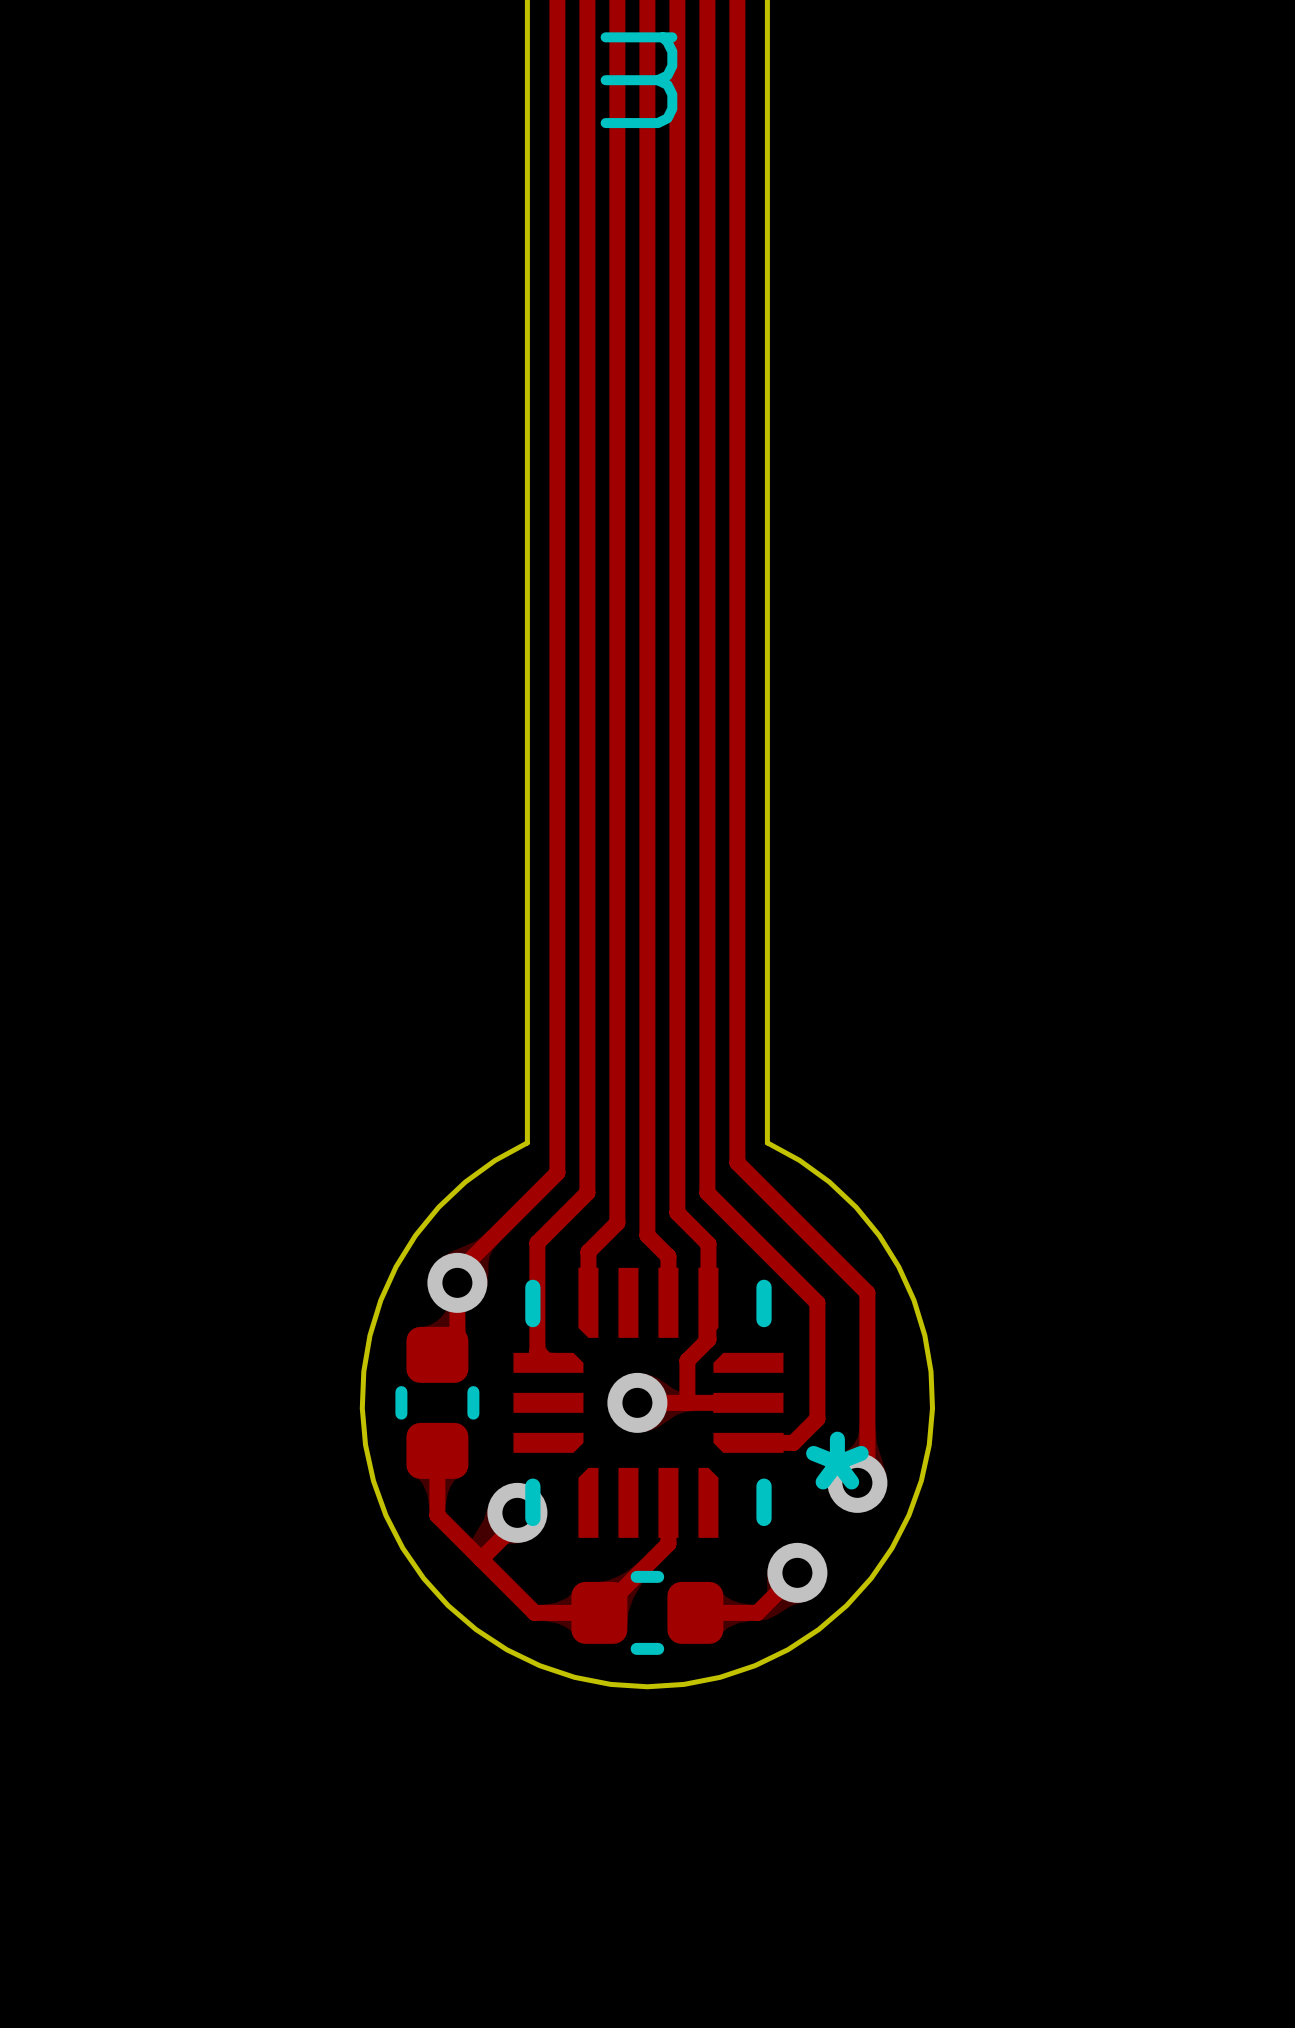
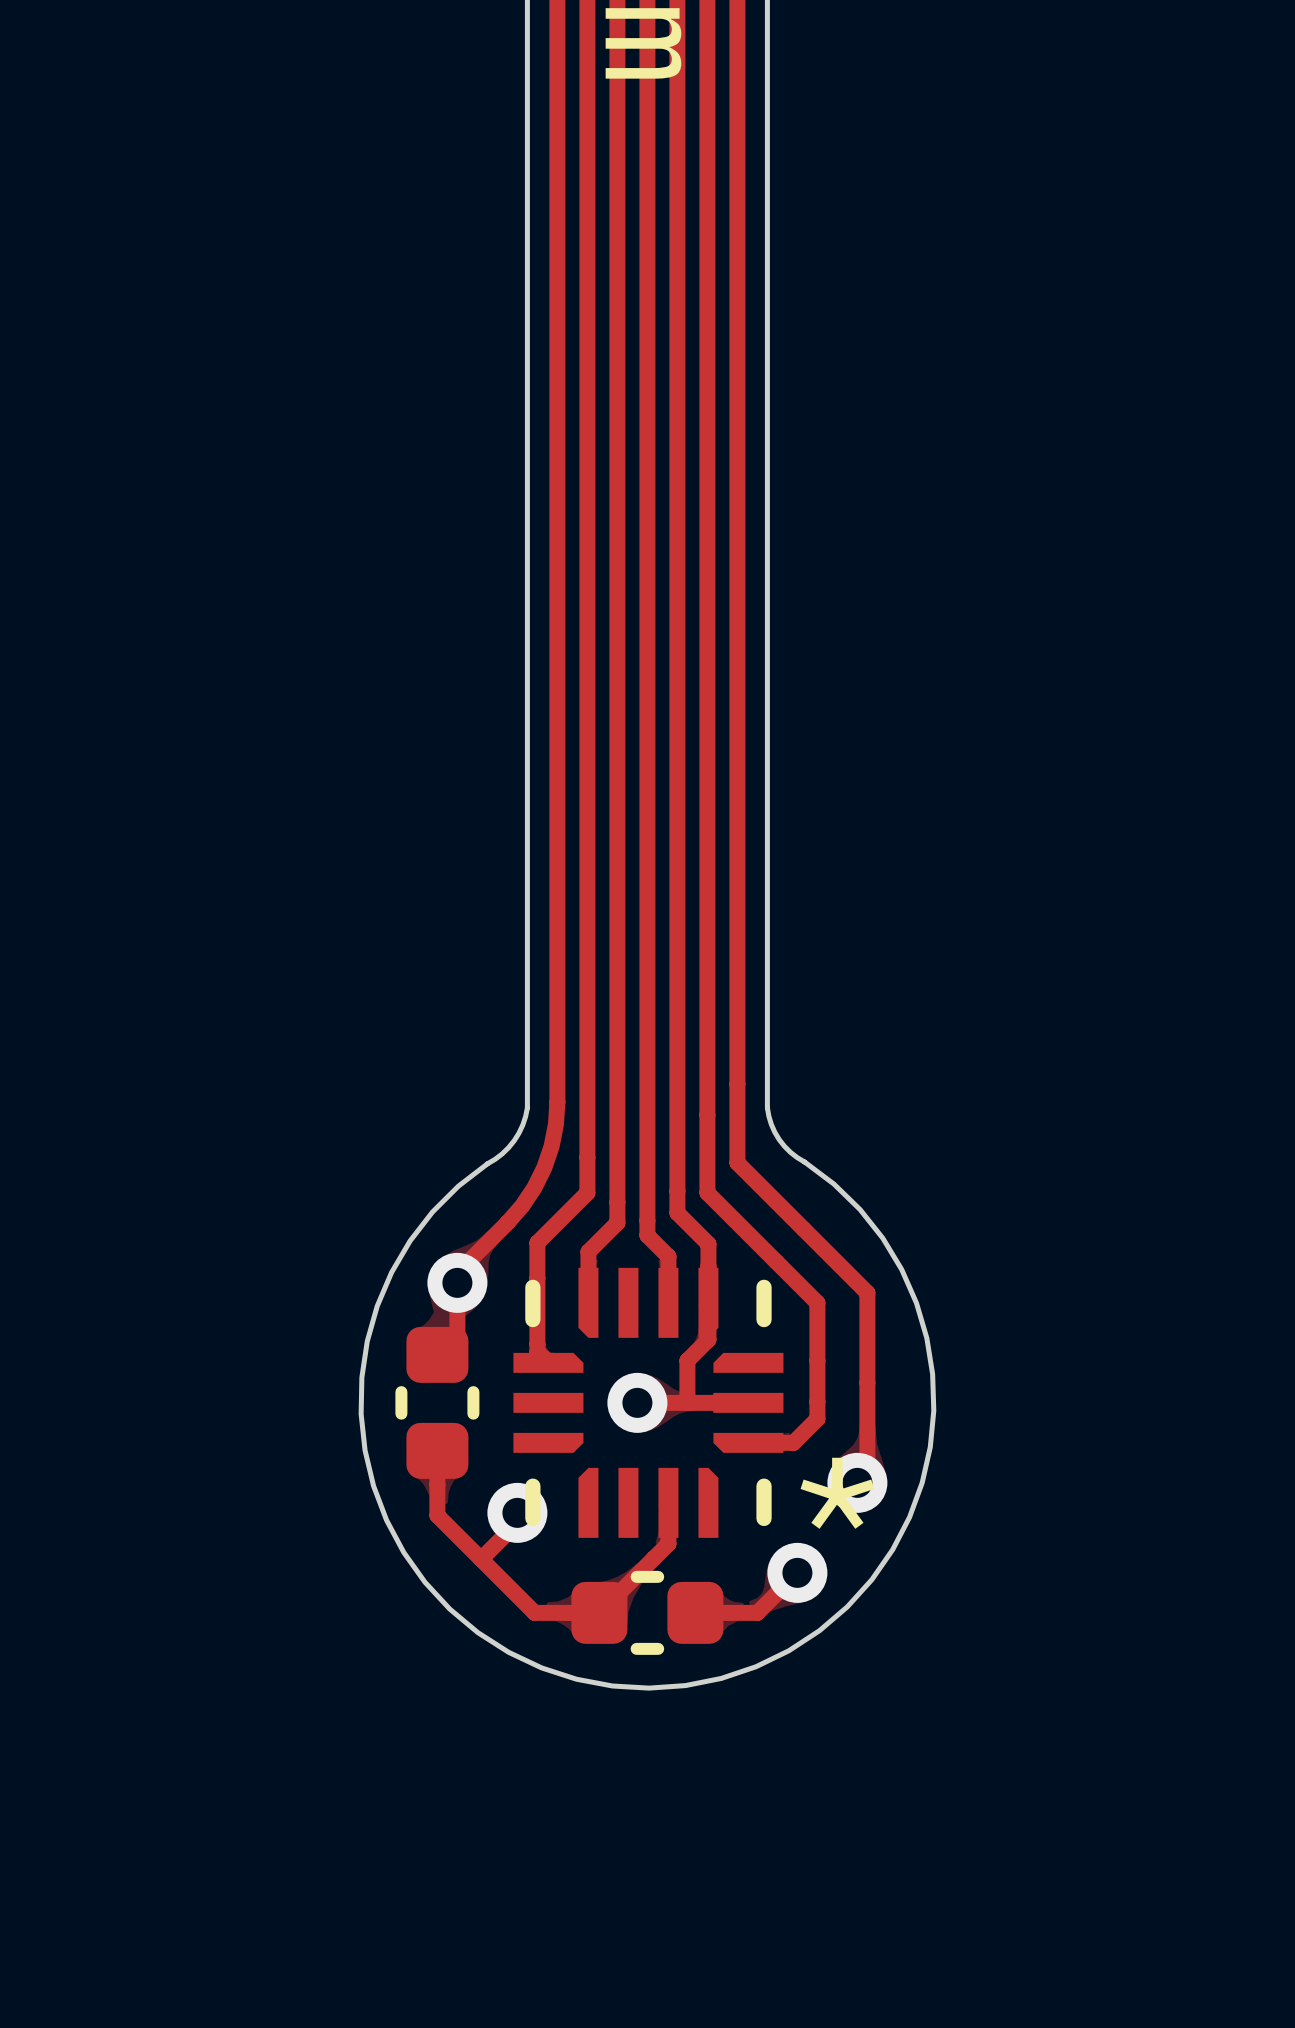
track: (557, 1102) (557, 1172) (507, 1222) -> (557, 1102) (551, 1146) (544, 1167) (534, 1187) (507, 1222)
board edge: (527, 1107) (527, 1142) (495, 1160) (465, 1182) (438, 1207) (415, 1235) (396, 1266) (380, 1300) (369, 1335) (363, 1371) (362, 1408) (365, 1444) (373, 1480) (385, 1515) (402, 1548) (423, 1578) (448, 1605) (476, 1629) (506, 1649) (539, 1665) (574, 1677) (610, 1684) (647, 1686) (684, 1684) (720, 1677) (754, 1665) (788, 1649) (818, 1629) (846, 1605) (871, 1578) (892, 1548) (908, 1515) (921, 1480) (929, 1444) (932, 1408) (931, 1371) (924, 1335) (914, 1300) (898, 1266) (879, 1235) (856, 1207) (829, 1182) (799, 1160) (767, 1142) (767, 1107) -> (527, 1107) (518, 1133) (508, 1147) (458, 1186) (432, 1212) (410, 1240) (391, 1272) (377, 1306) (367, 1341) (361, 1377) (361, 1414) (365, 1450) (373, 1486) (386, 1520) (403, 1552) (425, 1582) (449, 1609) (477, 1632) (508, 1652) (541, 1667) (576, 1679) (612, 1686) (649, 1688) (685, 1685) (721, 1678) (756, 1666) (788, 1650) (819, 1630) (847, 1606) (871, 1579) (892, 1549) (909, 1517) (922, 1482) (930, 1447) (933, 1410) (932, 1374) (926, 1338) (916, 1303) (901, 1269) (882, 1238) (860, 1209) (833, 1184) (784, 1146) (771, 1124) (767, 1107)

